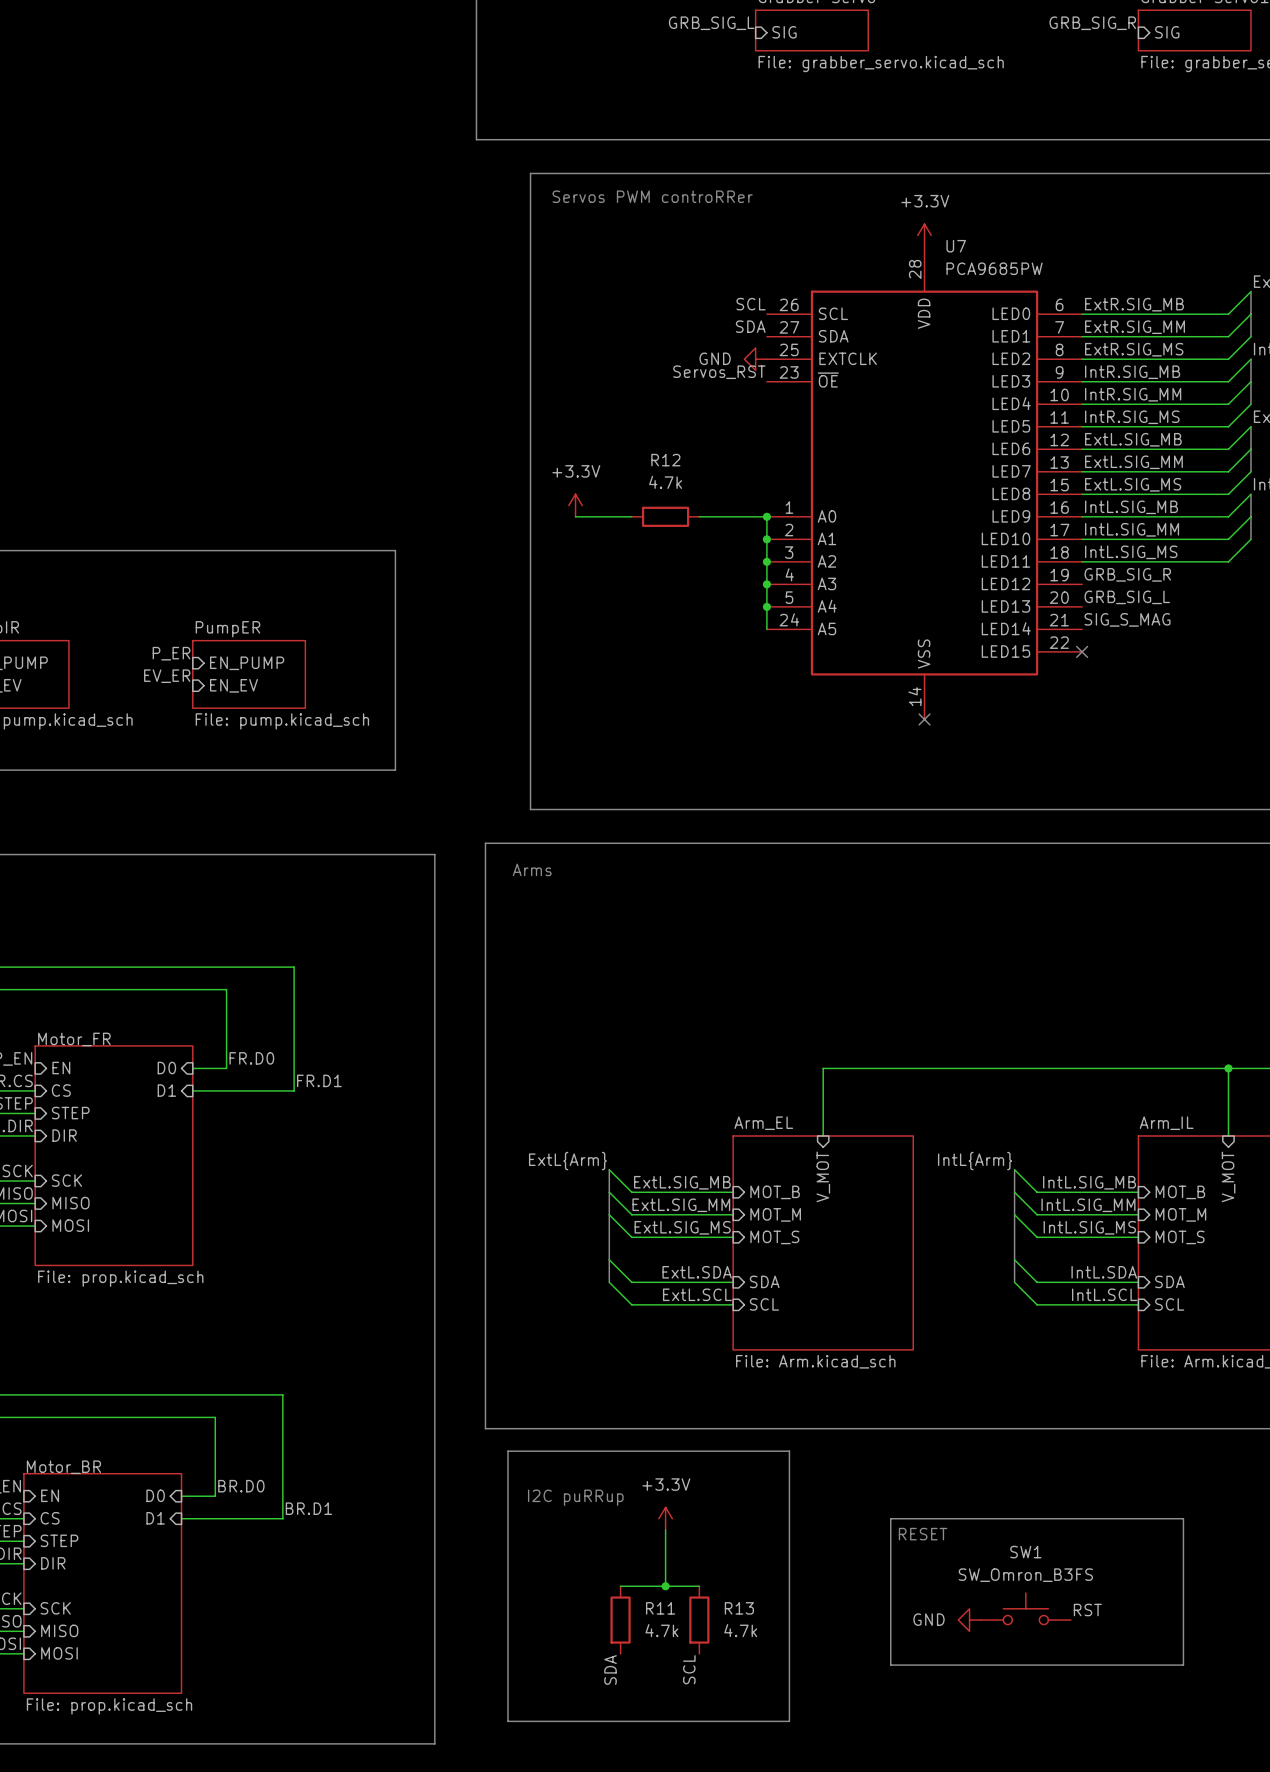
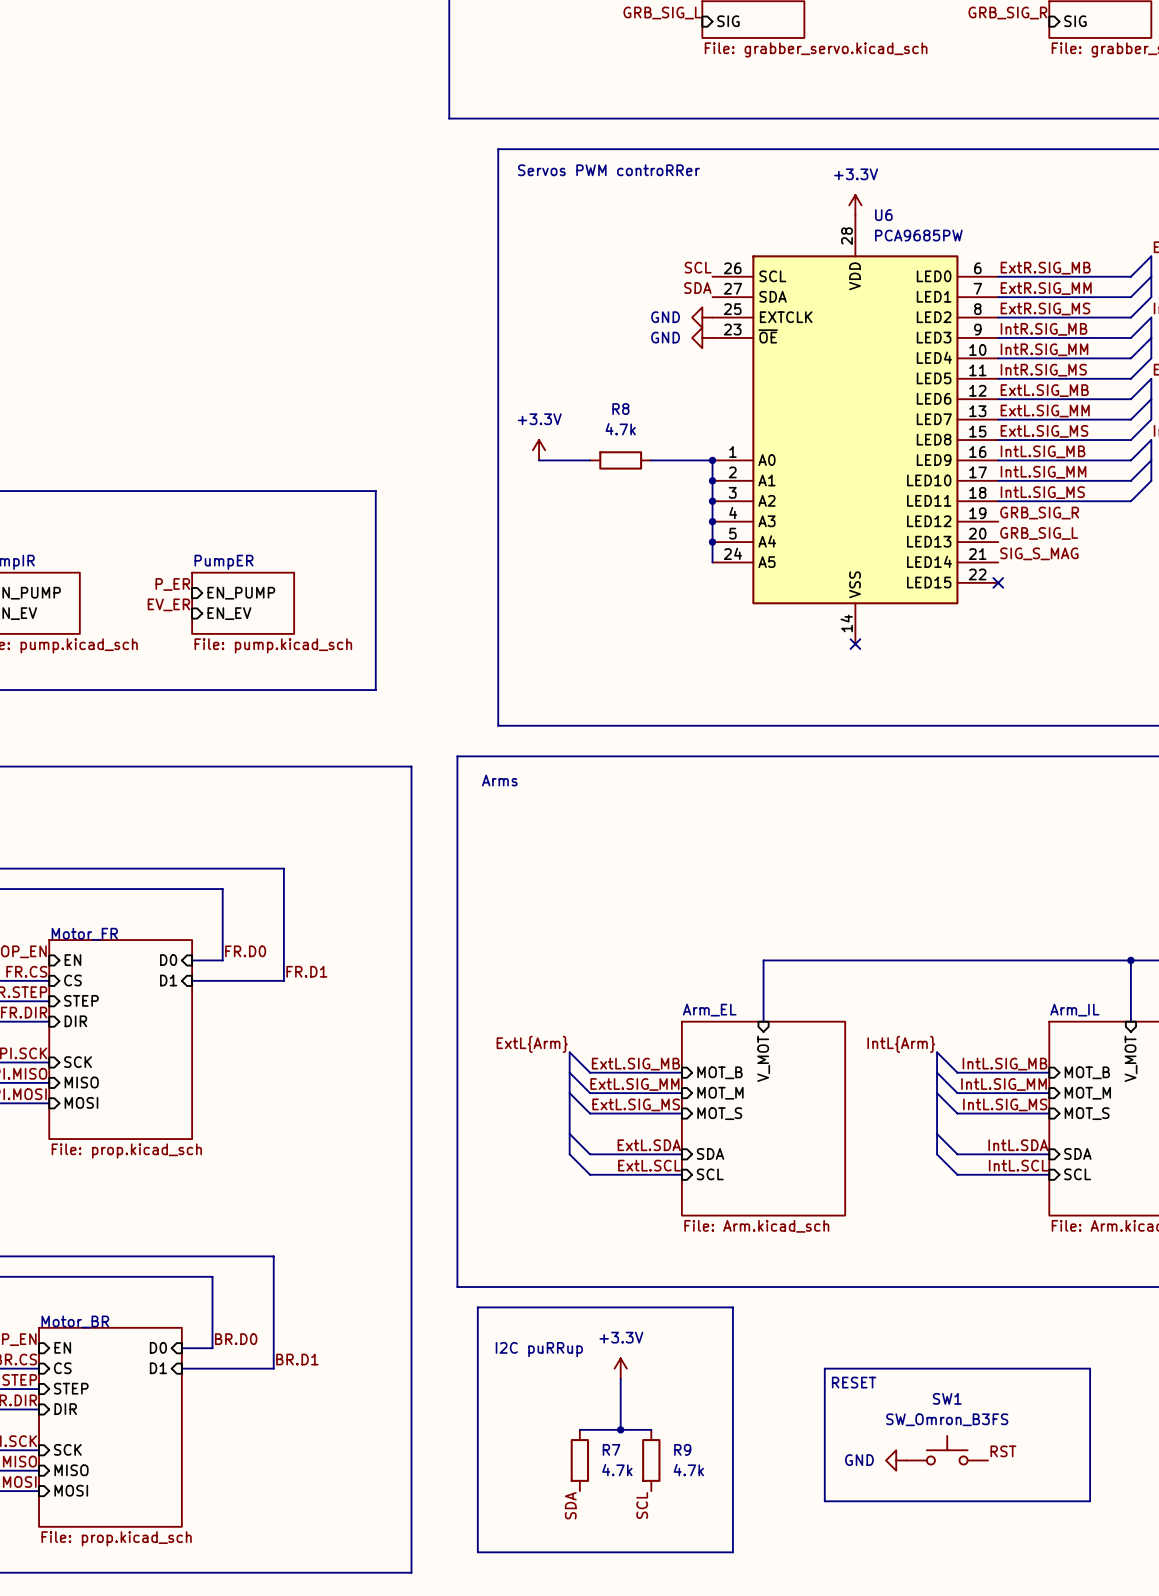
U7 name: U7 (956, 246) -> U6 (883, 215)
label: Servos_RST (719, 372) -> none
power symbol: none -> GND (702, 337)
R12 name: R12 (665, 460) -> R8 (620, 409)
R11 name: R11 (660, 1608) -> R7 (611, 1449)
R13 name: R13 (739, 1608) -> R9 (682, 1449)

